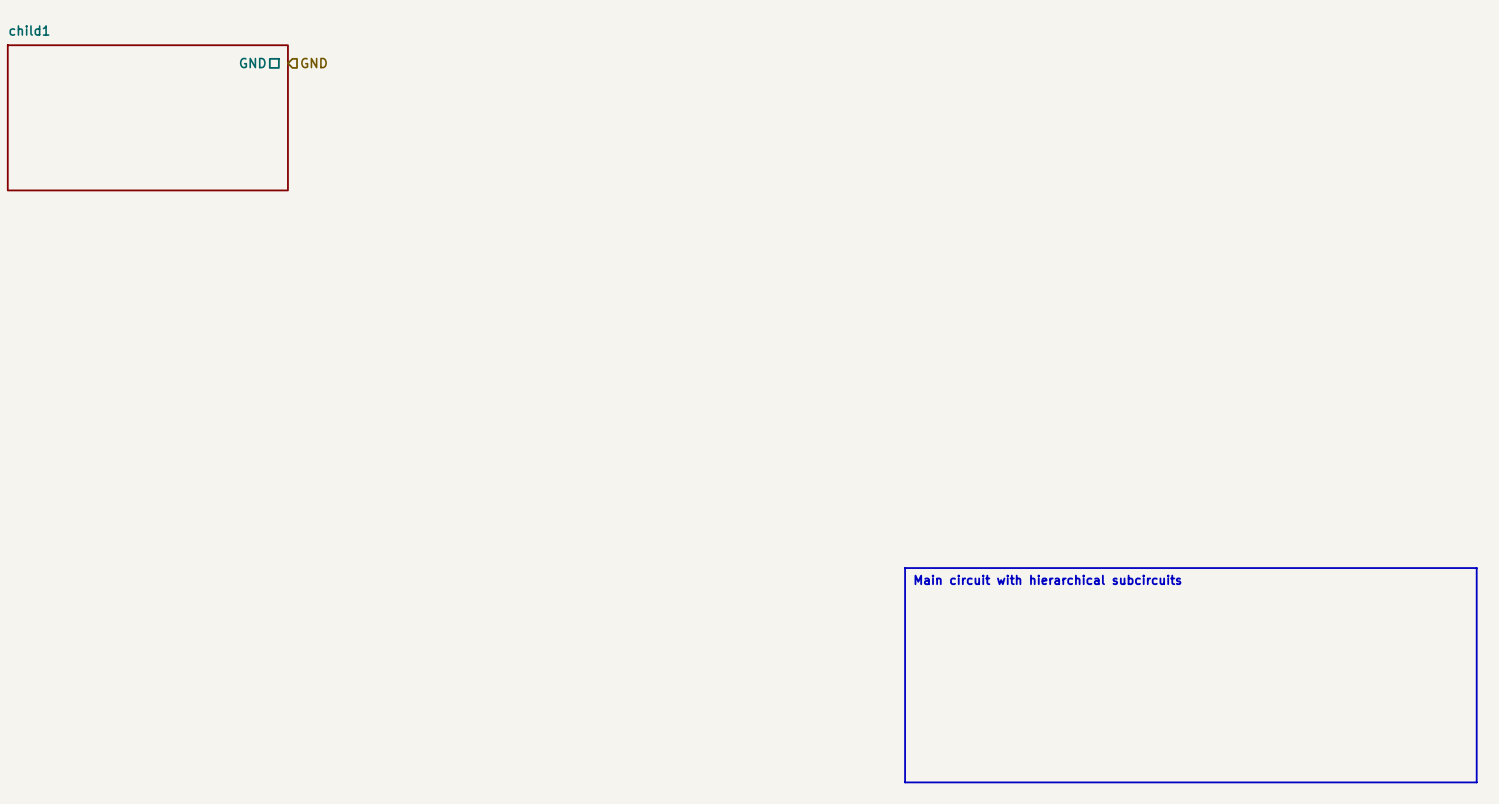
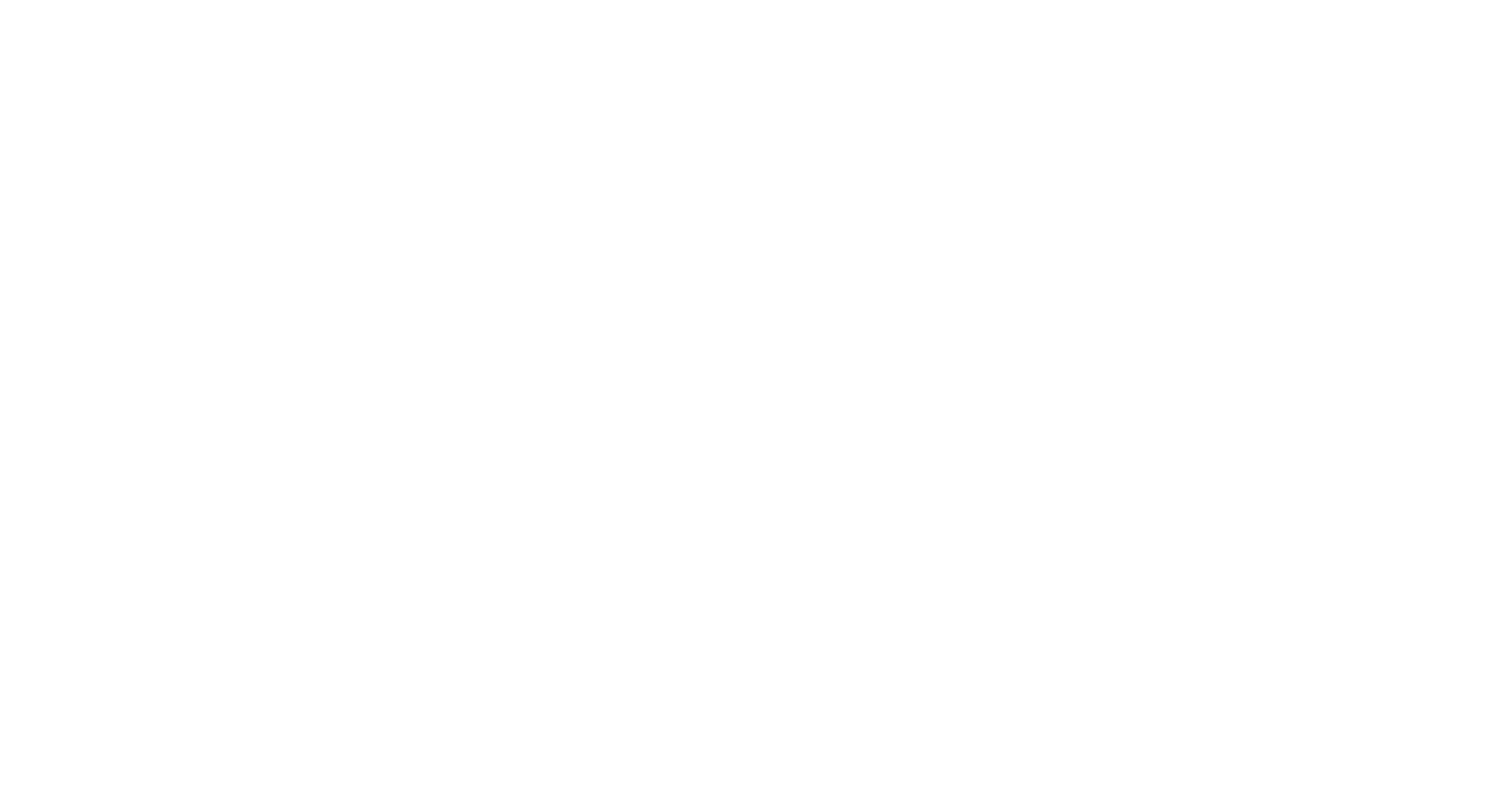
sheet pin: GND (252, 63) -> none
hierarchical label: GND (314, 63) -> none
sheet child1: (147, 117) -> none
line: (905, 568) (1476, 568) (1476, 782) (905, 782) (905, 568) -> none
text: Main circuit with hierarchical subcircuits (1047, 579) -> none

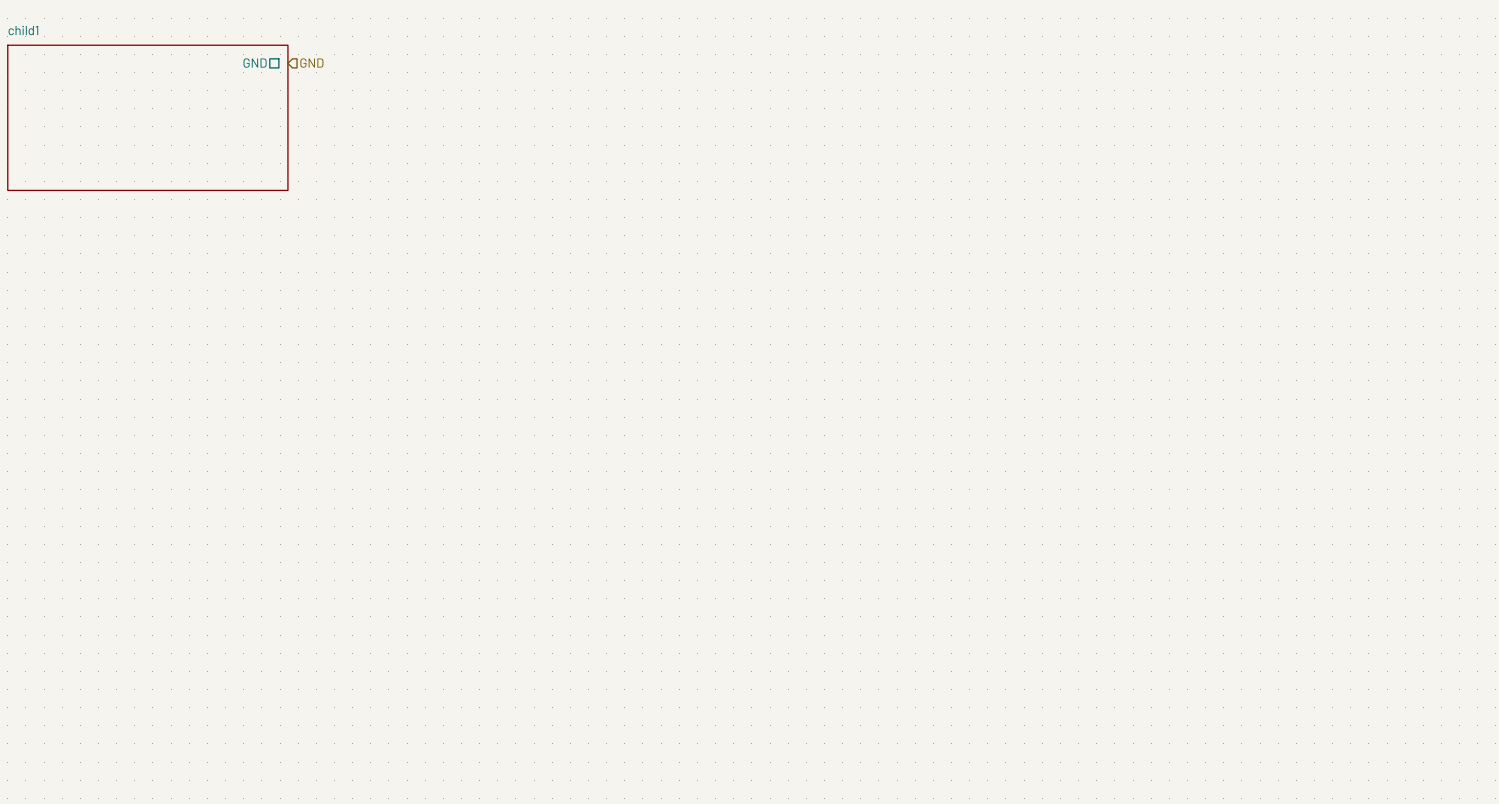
sheet pin: none -> GND (255, 63)
hierarchical label: none -> GND (311, 63)
sheet child1: none -> (147, 117)

